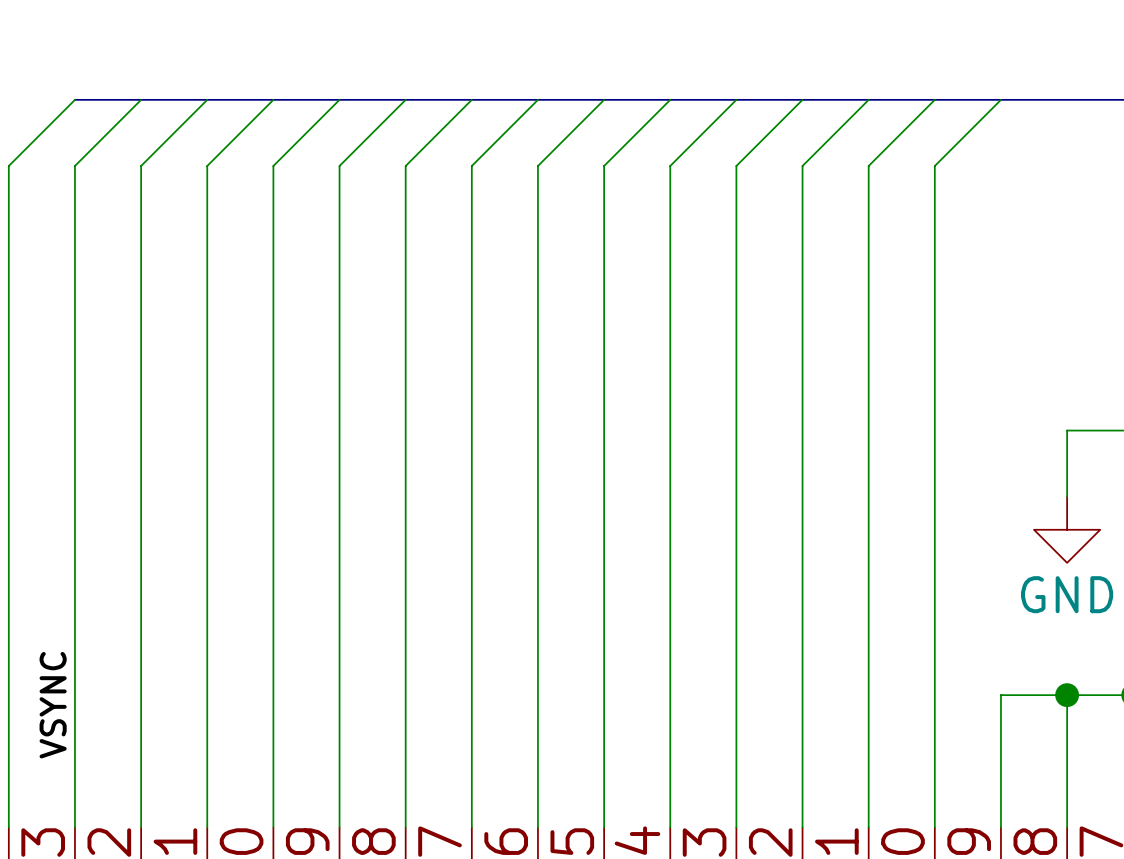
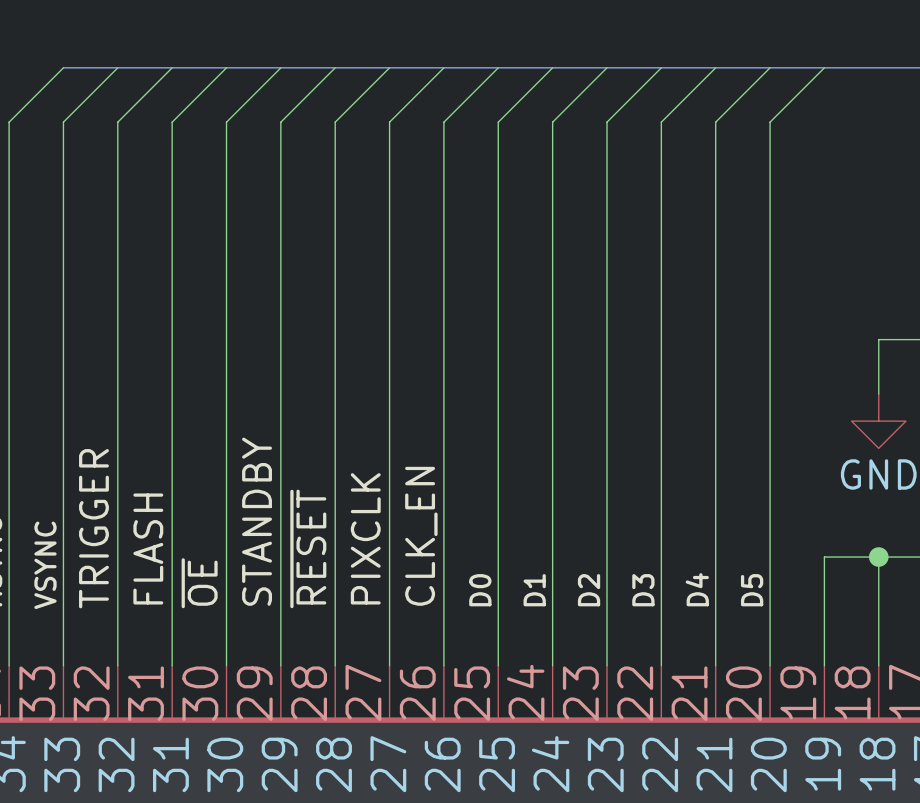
label: none -> STANDBY (257, 521)
label: none -> TRIGGER (93, 528)
label: none -> CLK_EN (421, 536)
label: none -> PIXCLK (365, 538)
label: none -> FLASH (148, 548)
label: none -> ~{RESET} (308, 548)
label: none -> ~{OE} (199, 583)
label: none -> D4 (697, 589)
label: none -> D0 (480, 590)
label: none -> D1 (534, 590)
label: none -> D2 (589, 590)
label: none -> D3 (643, 590)
label: none -> D5 (752, 590)

